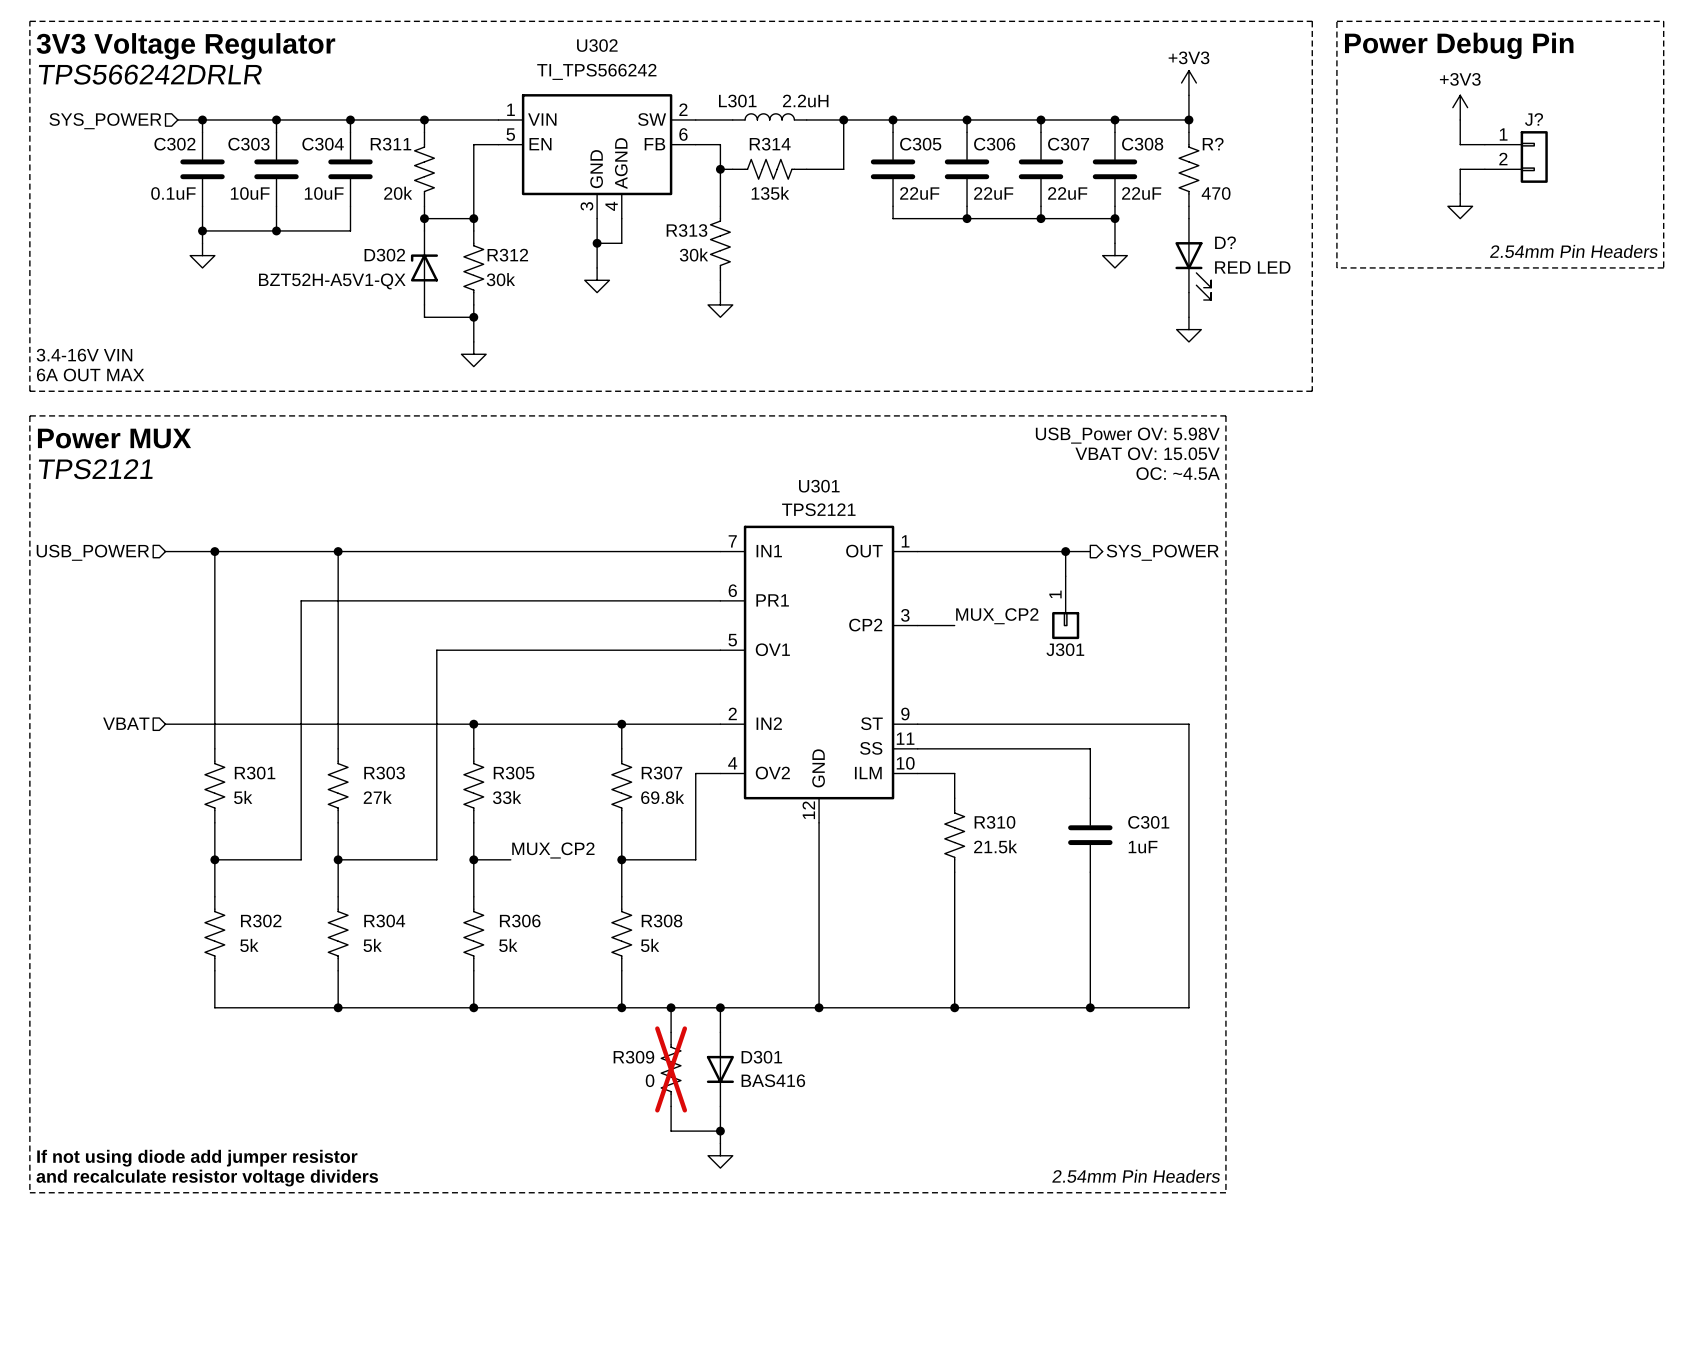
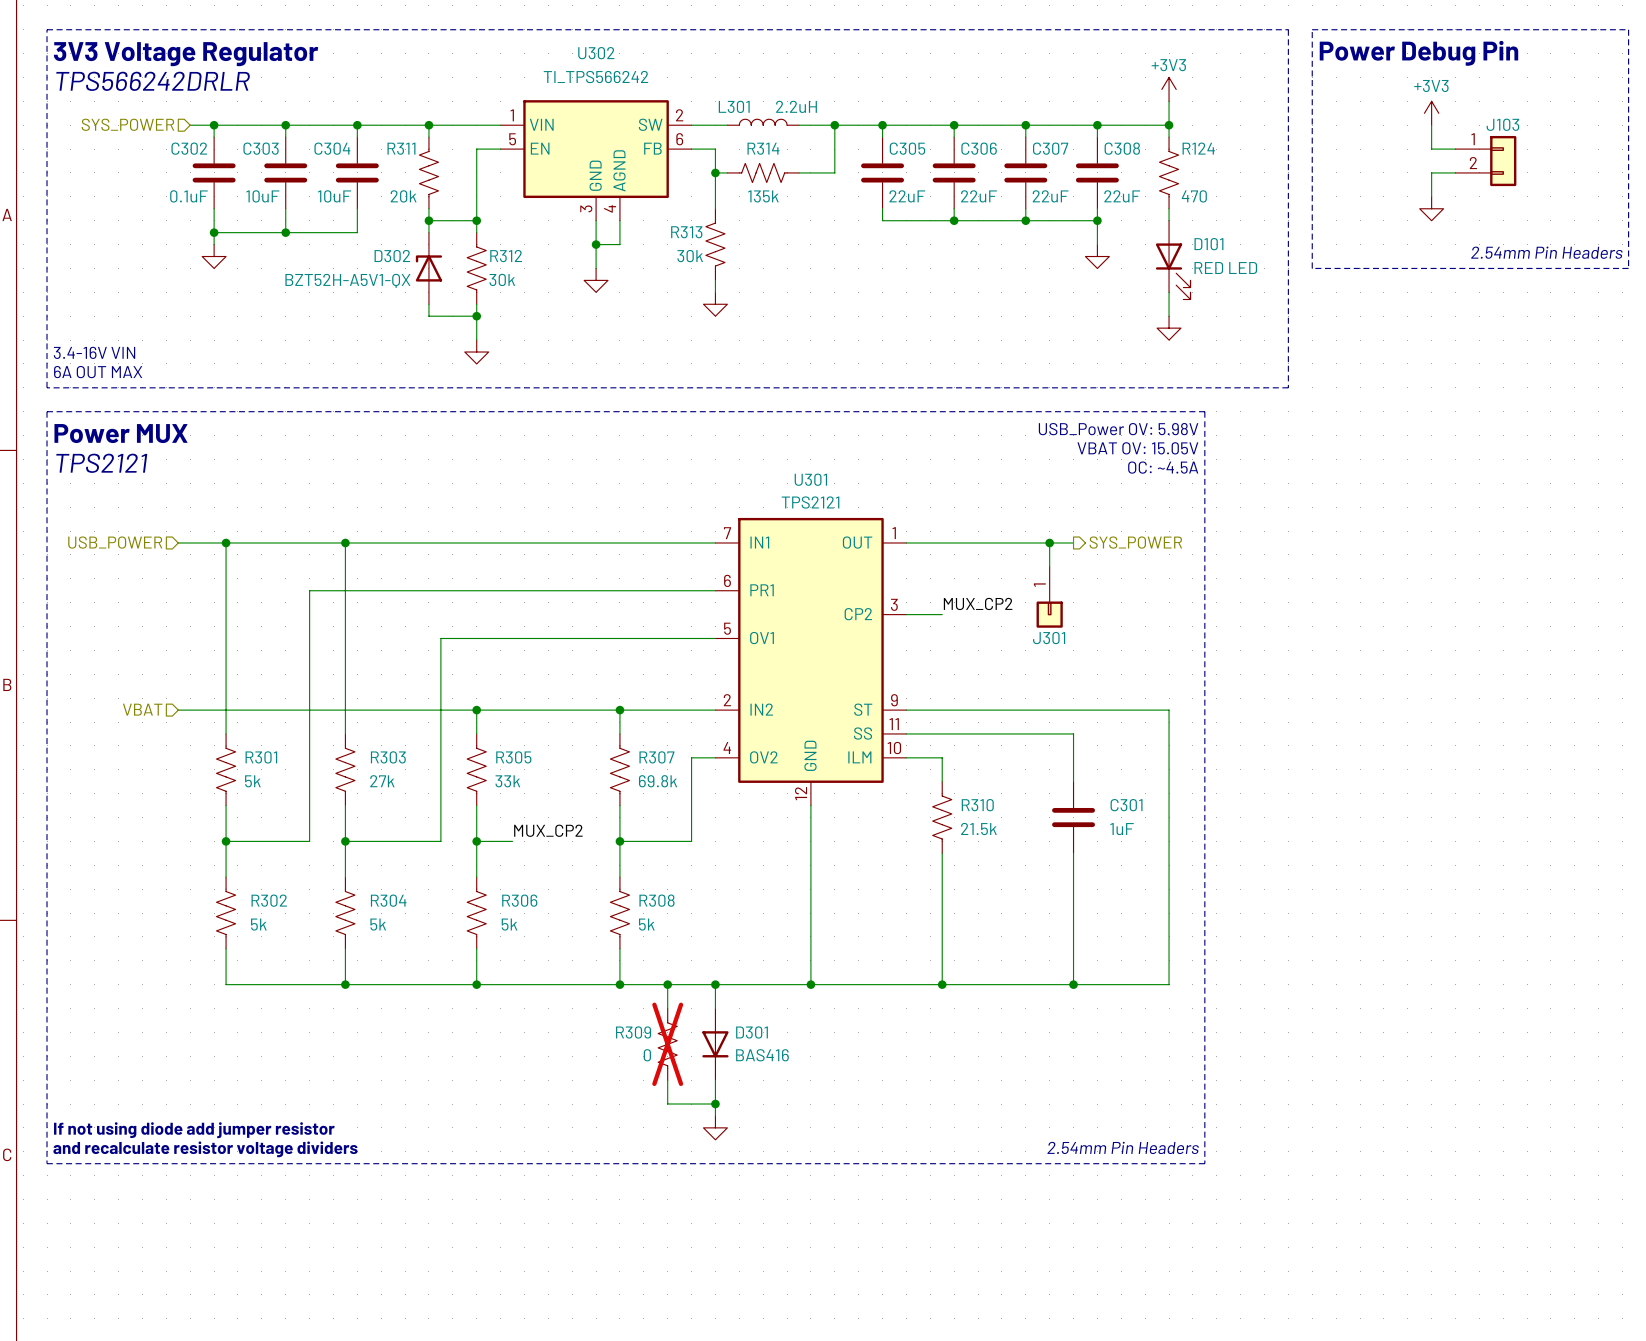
J? name: J? (1534, 119) -> J103 (1502, 124)
R? name: R? (1213, 144) -> R124 (1198, 148)
D? name: D? (1225, 242) -> D101 (1208, 244)

